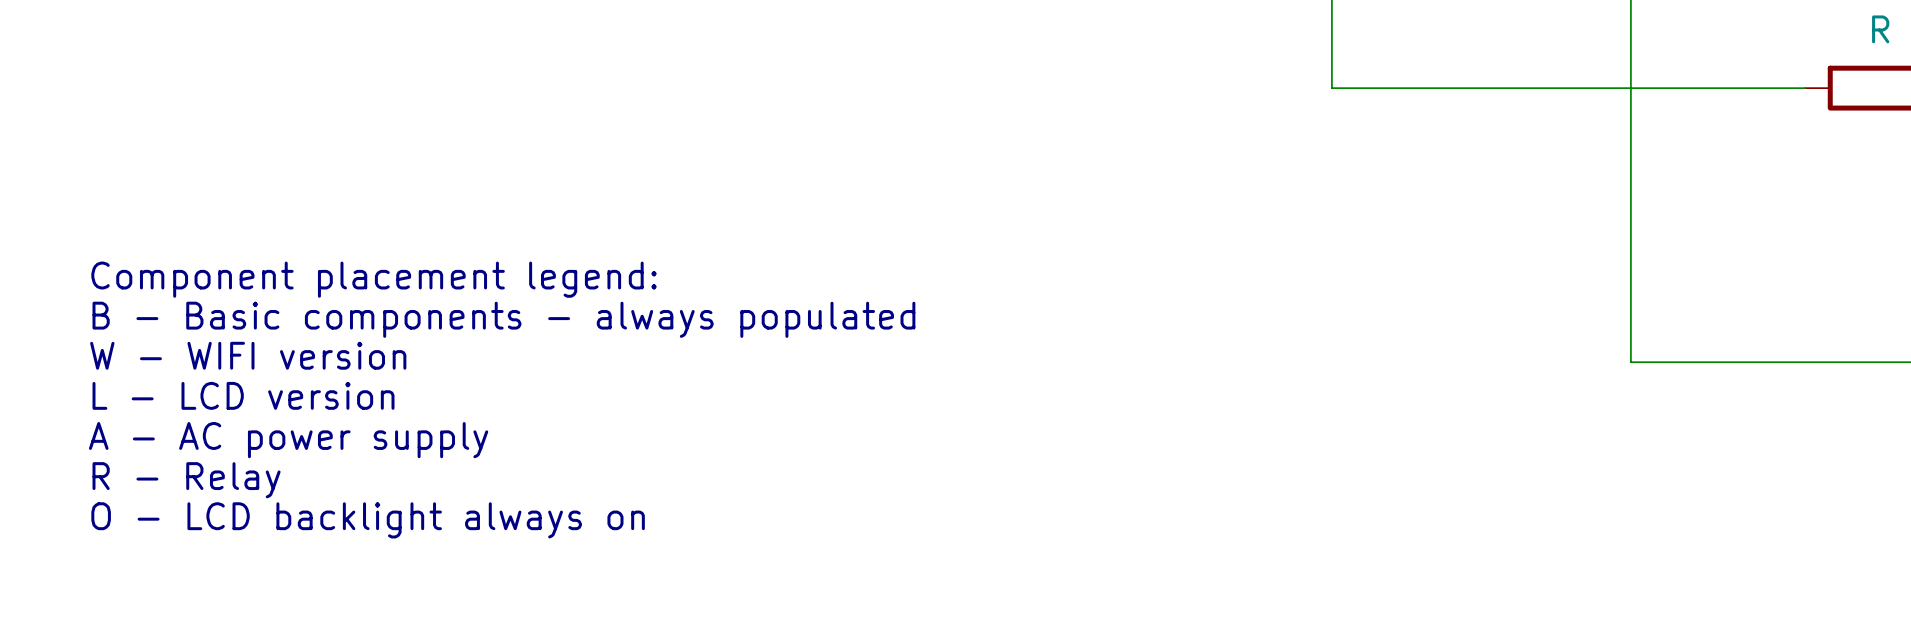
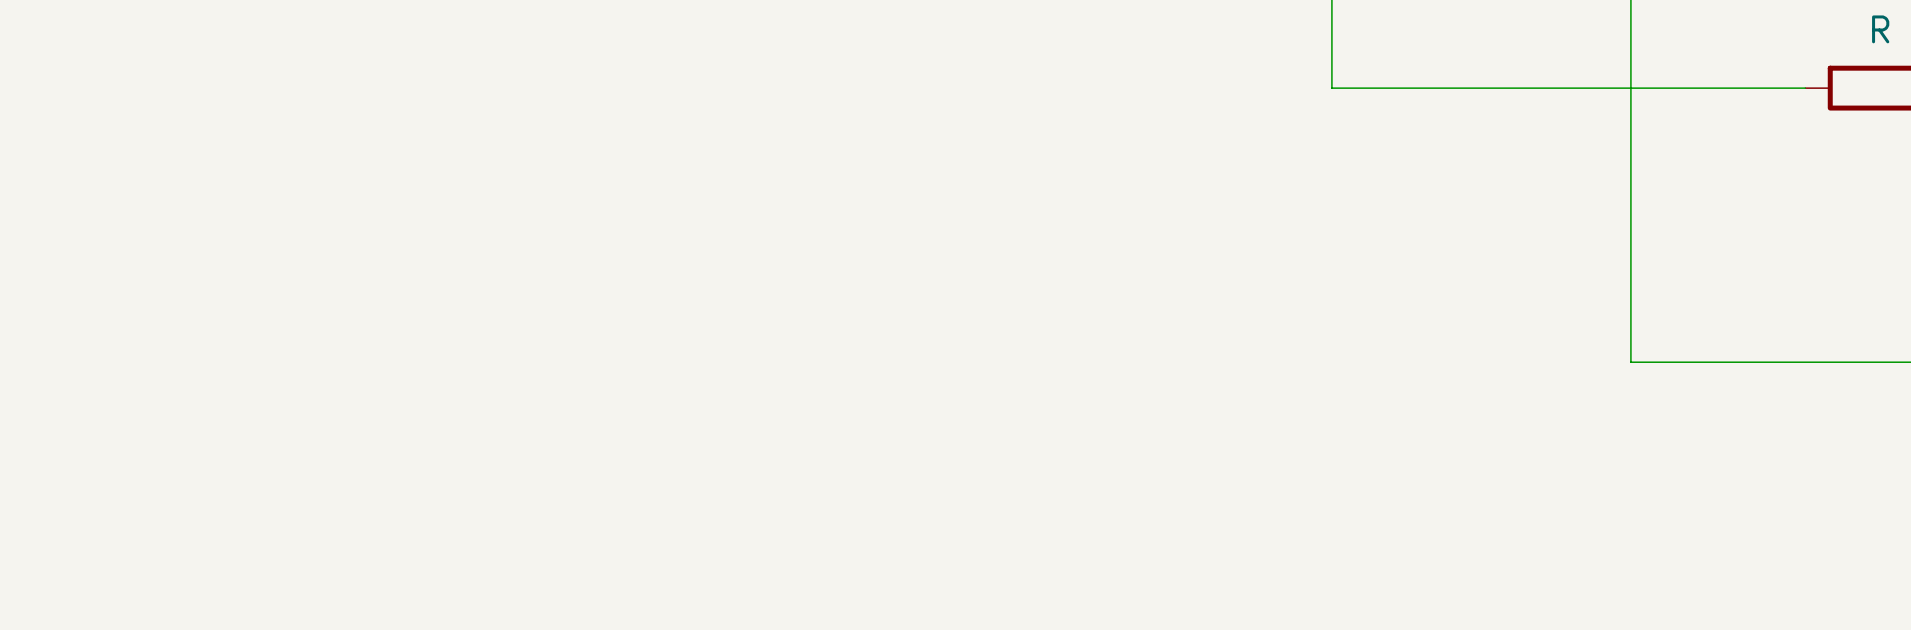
text: Component placement legend: (374, 279) -> none
text: B - Basic components - always populated (503, 319) -> none
text: W - WIFI version (248, 355) -> none
text: L - LCD version (243, 395) -> none
text: A - AC power supply (288, 440) -> none
text: R - Relay (186, 480) -> none
text: O - LCD backlight always on (368, 520) -> none

